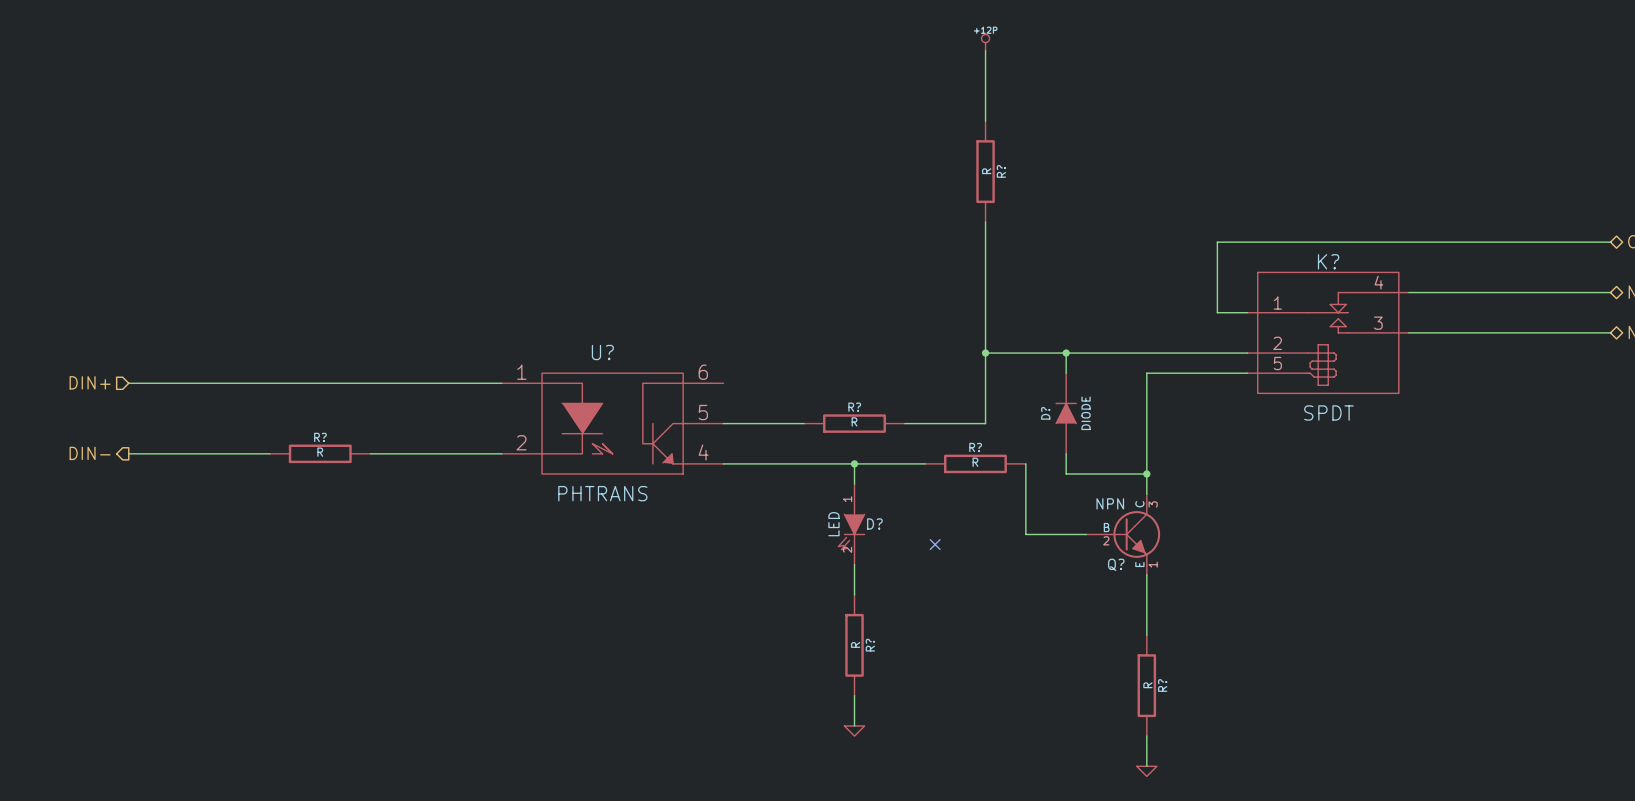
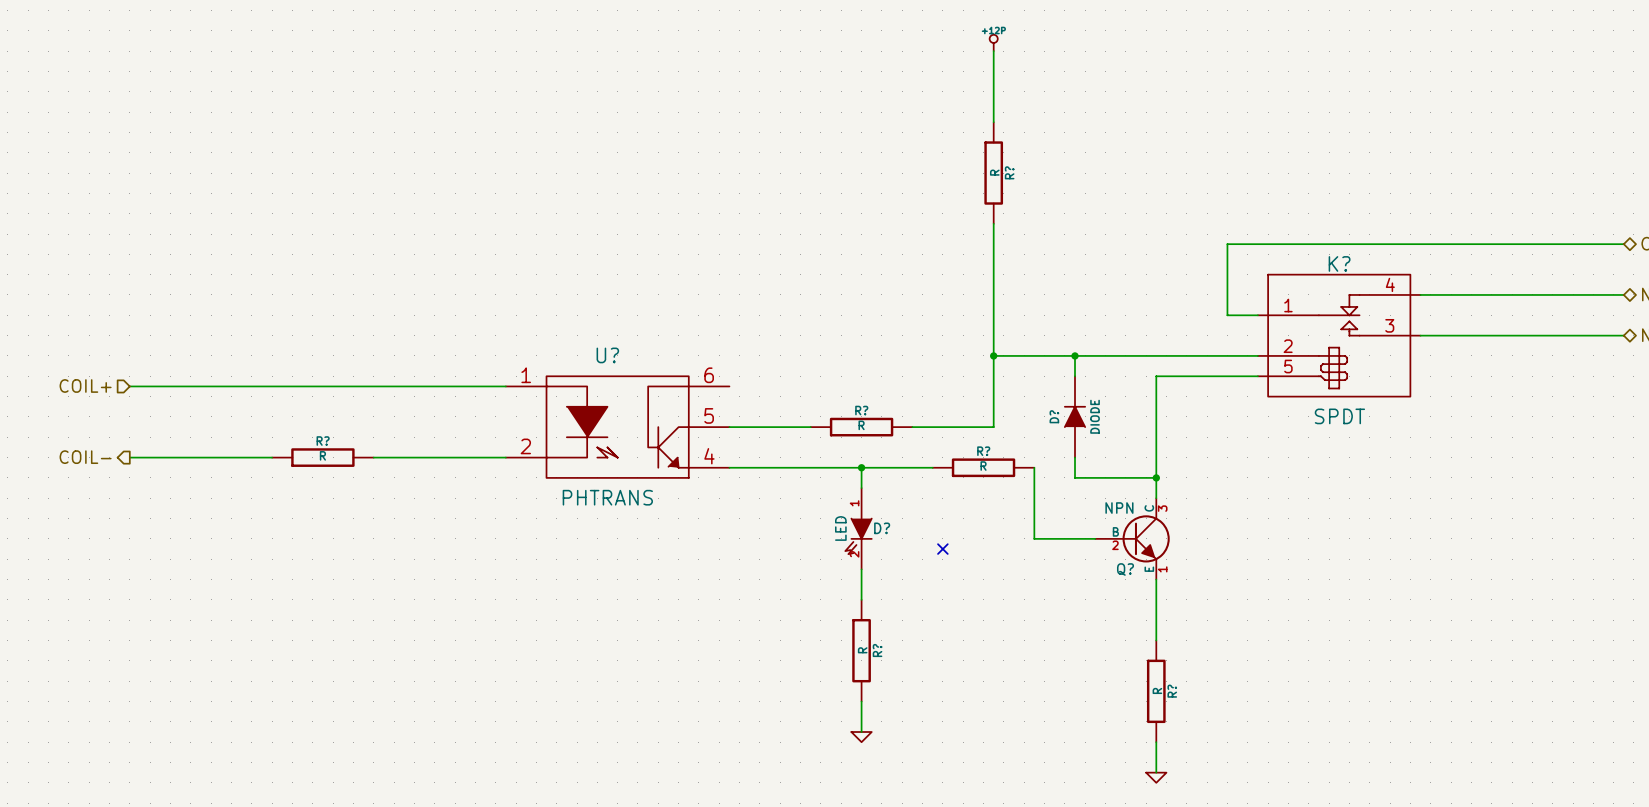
hierarchical label: DIN+ (90, 382) -> COIL+ (85, 385)
hierarchical label: DIN- (90, 453) -> COIL- (85, 457)

